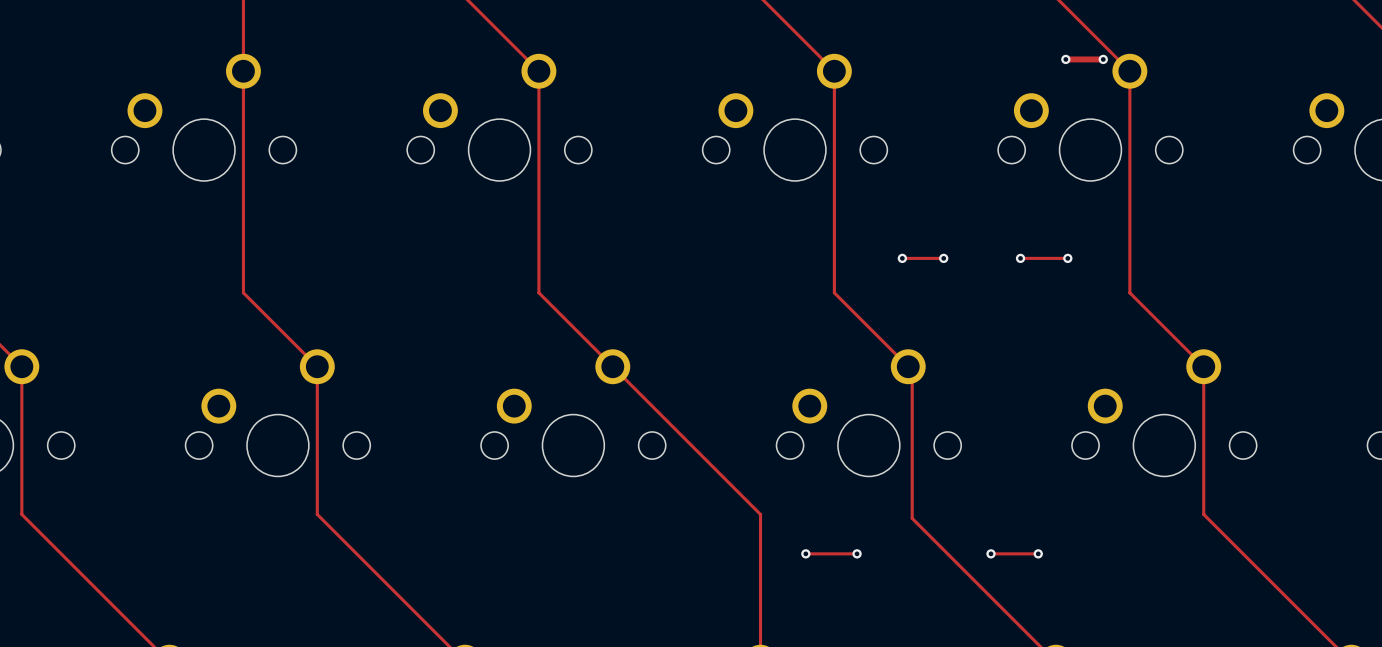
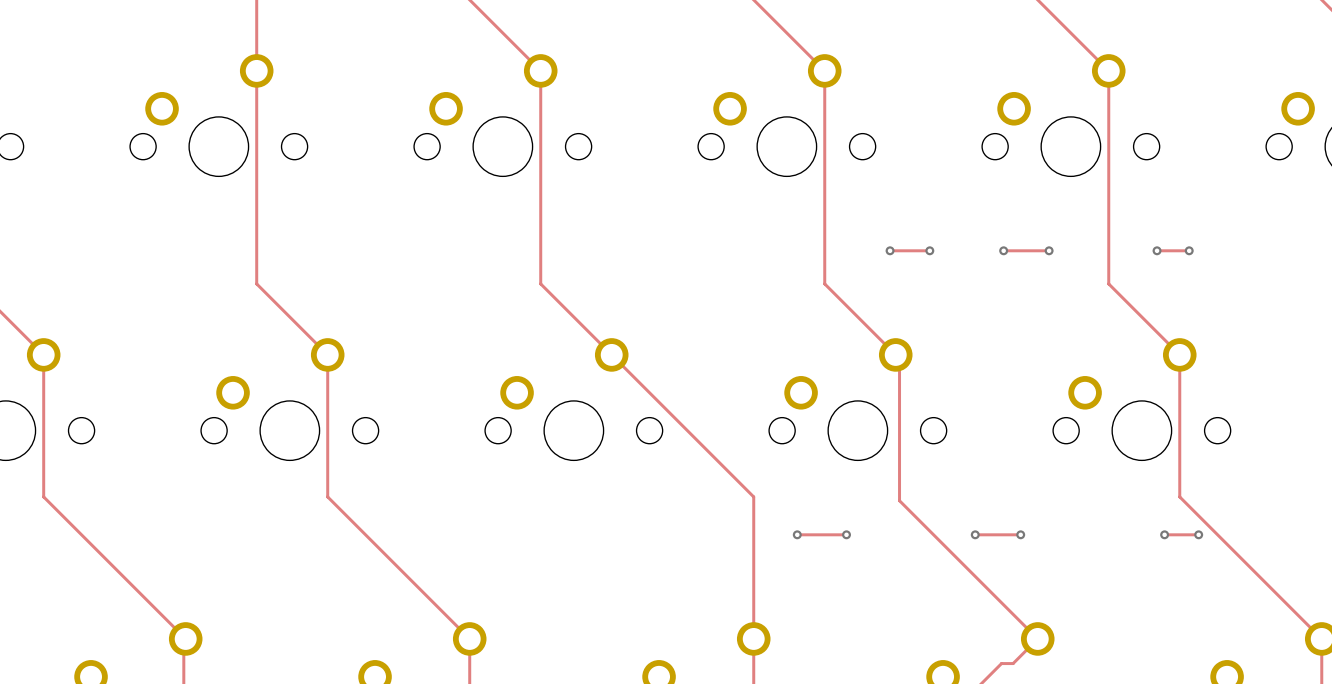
track: (1065, 59) (1103, 59) -> none
via: (1065, 59) -> none
via: (1103, 59) -> none
track: none -> (1157, 250) (1189, 250)
via: none -> (1157, 250)
via: none -> (1189, 250)
track: none -> (1164, 534) (1198, 534)
via: none -> (1164, 534)
via: none -> (1198, 534)

